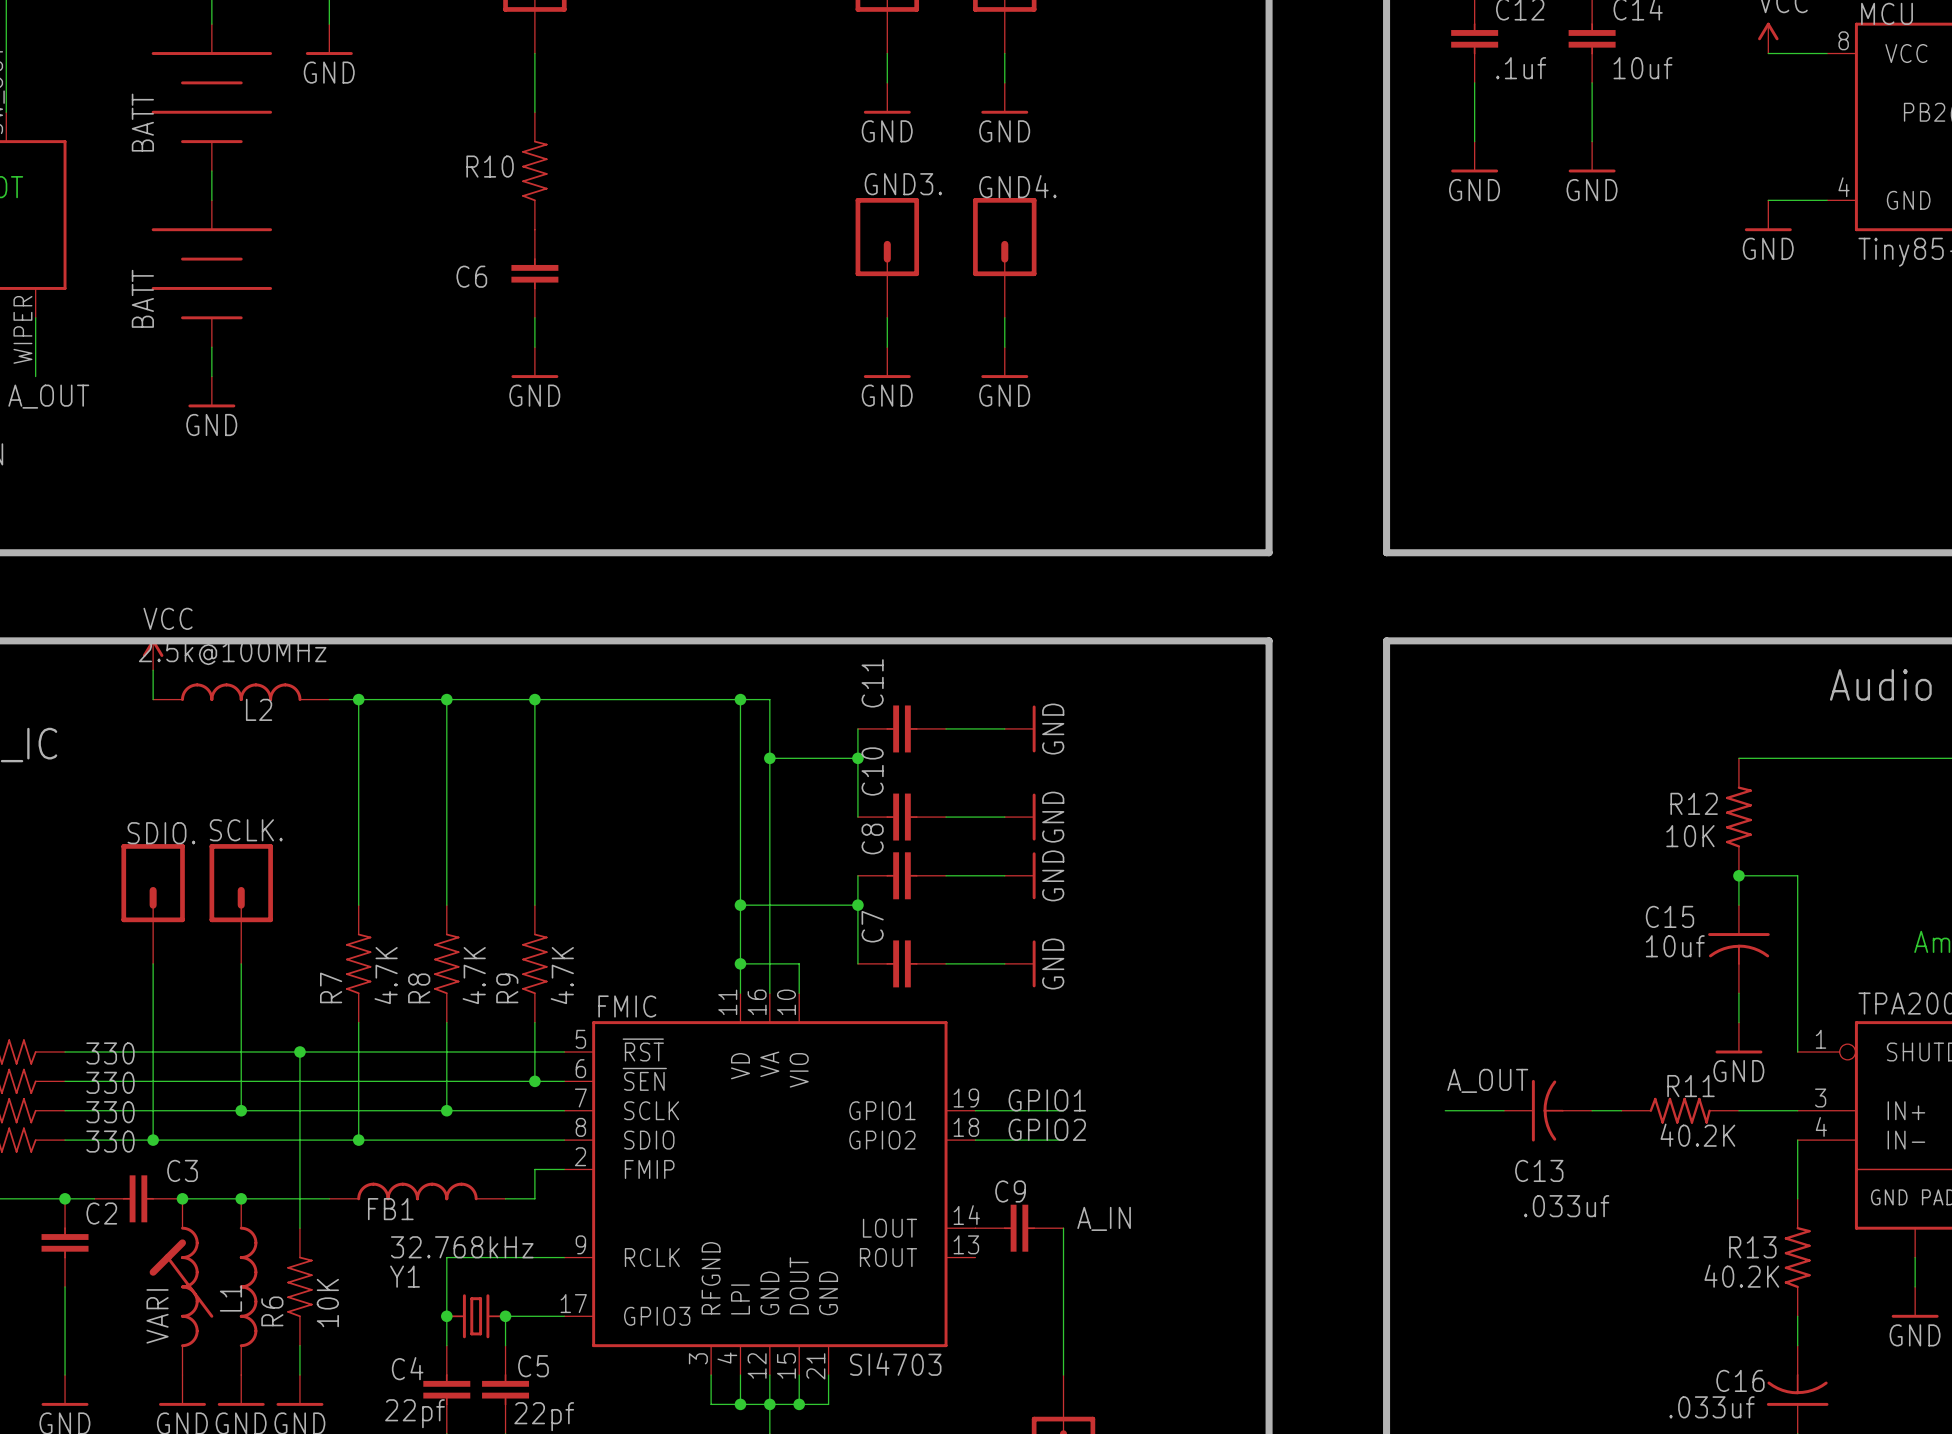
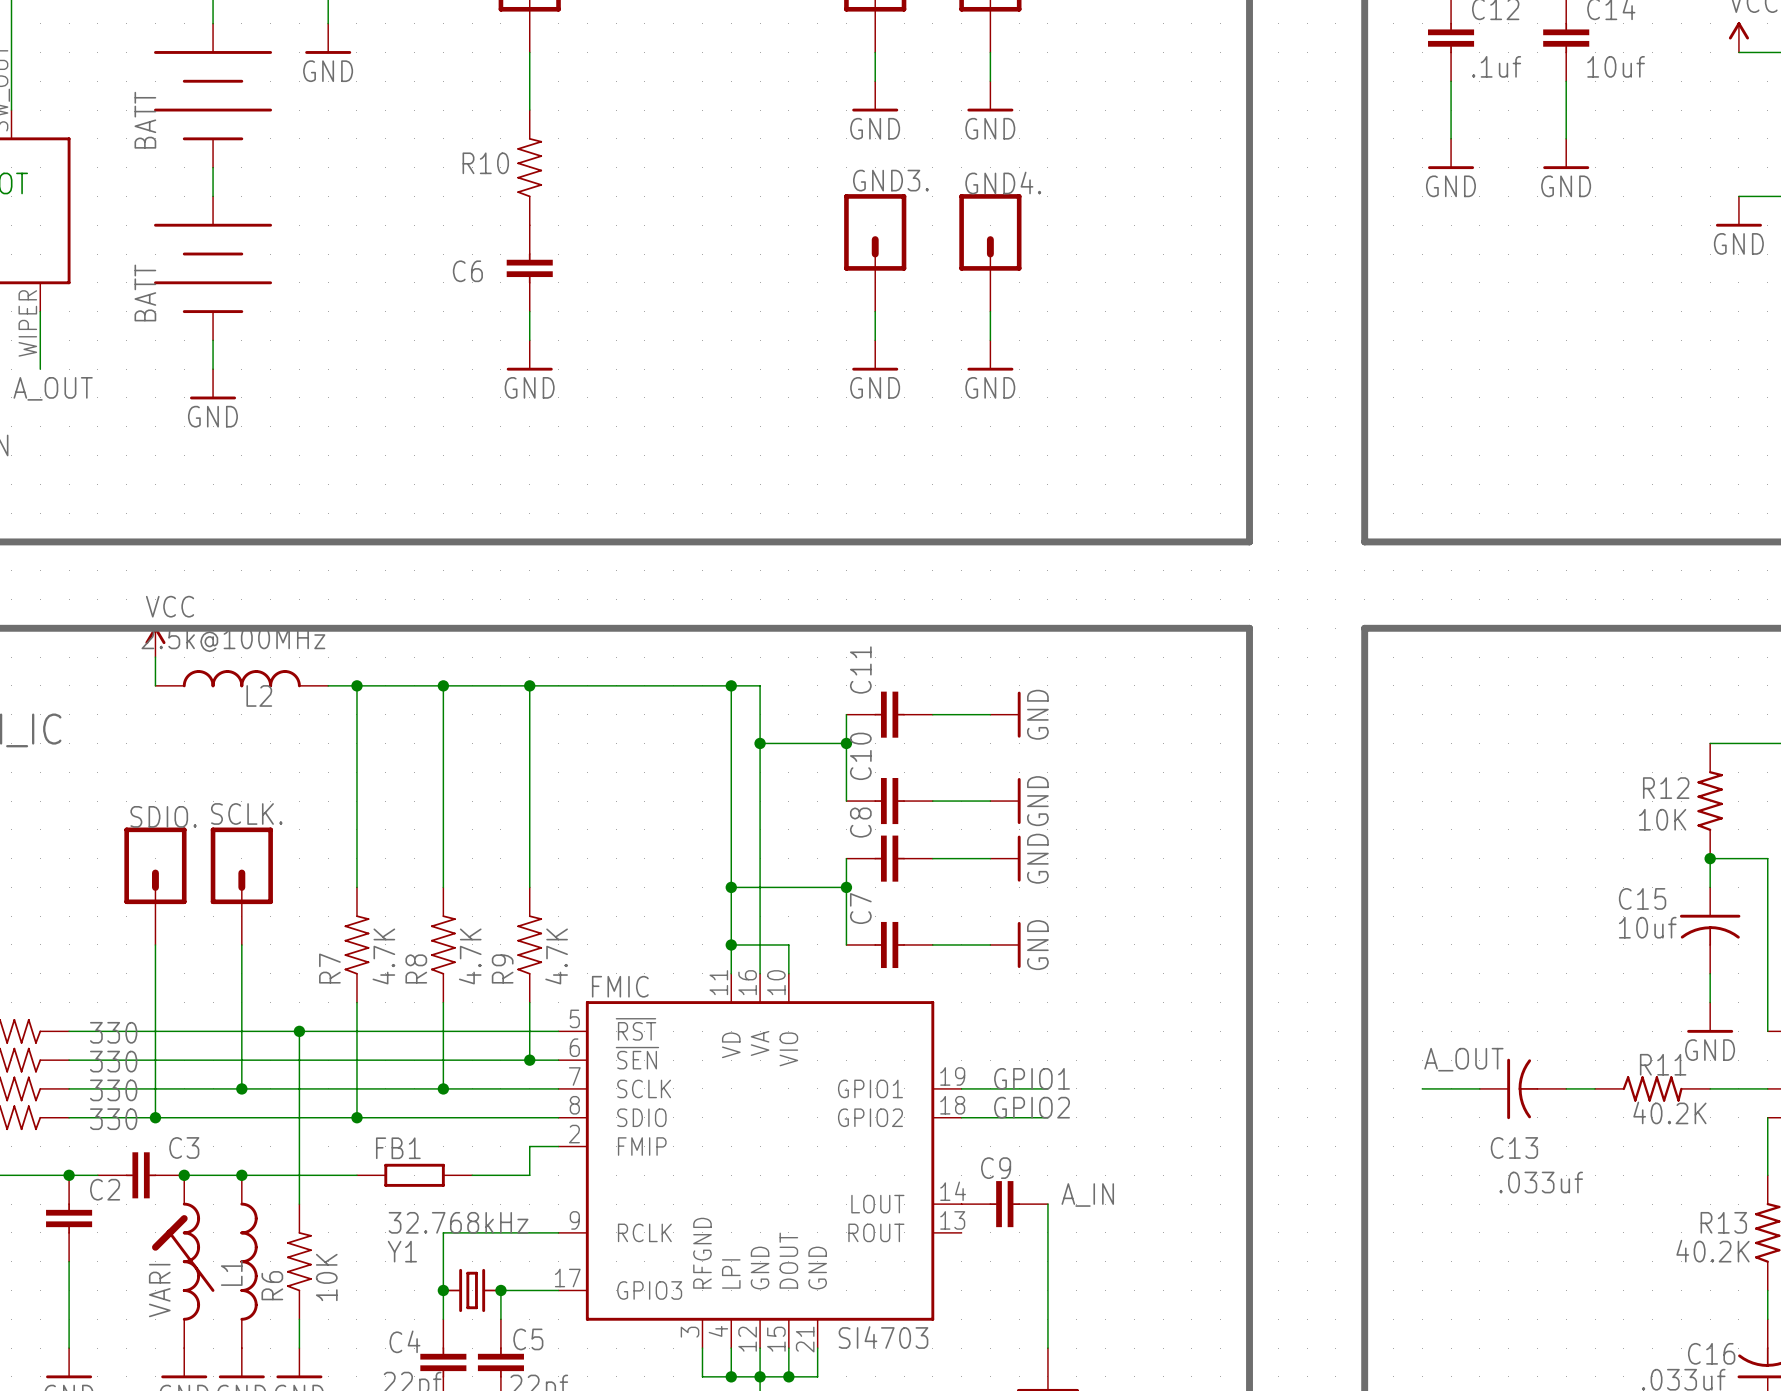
FB1 symbol: [329, 1182, 506, 1201] -> [356, 1163, 473, 1187]
FB1 name position: FB1 (390, 1209) -> FB1 (398, 1148)

